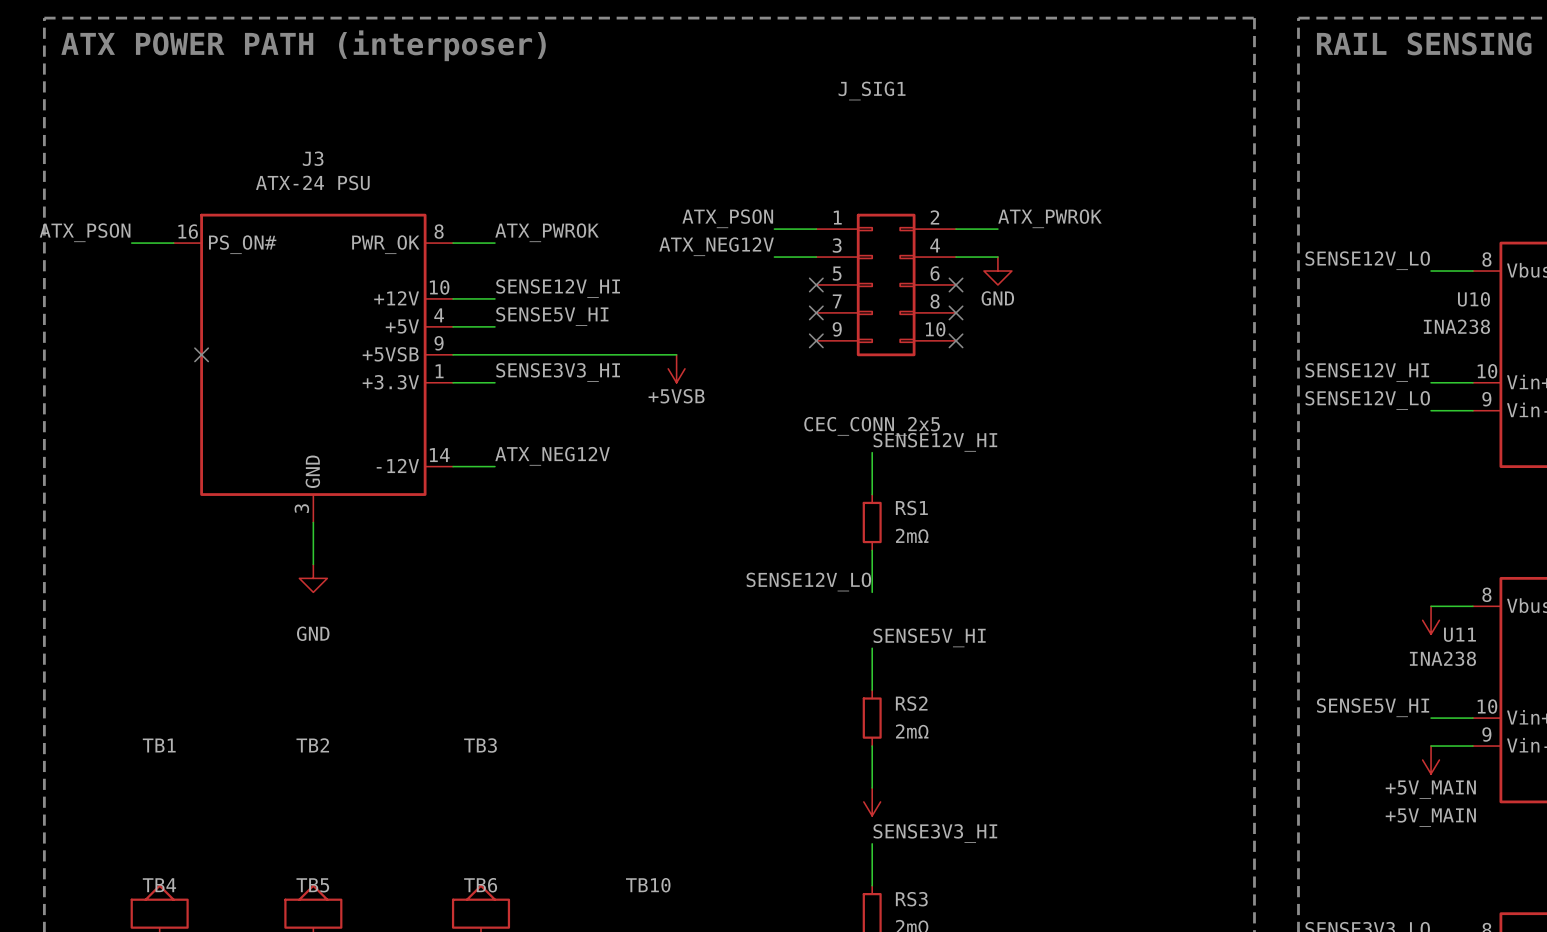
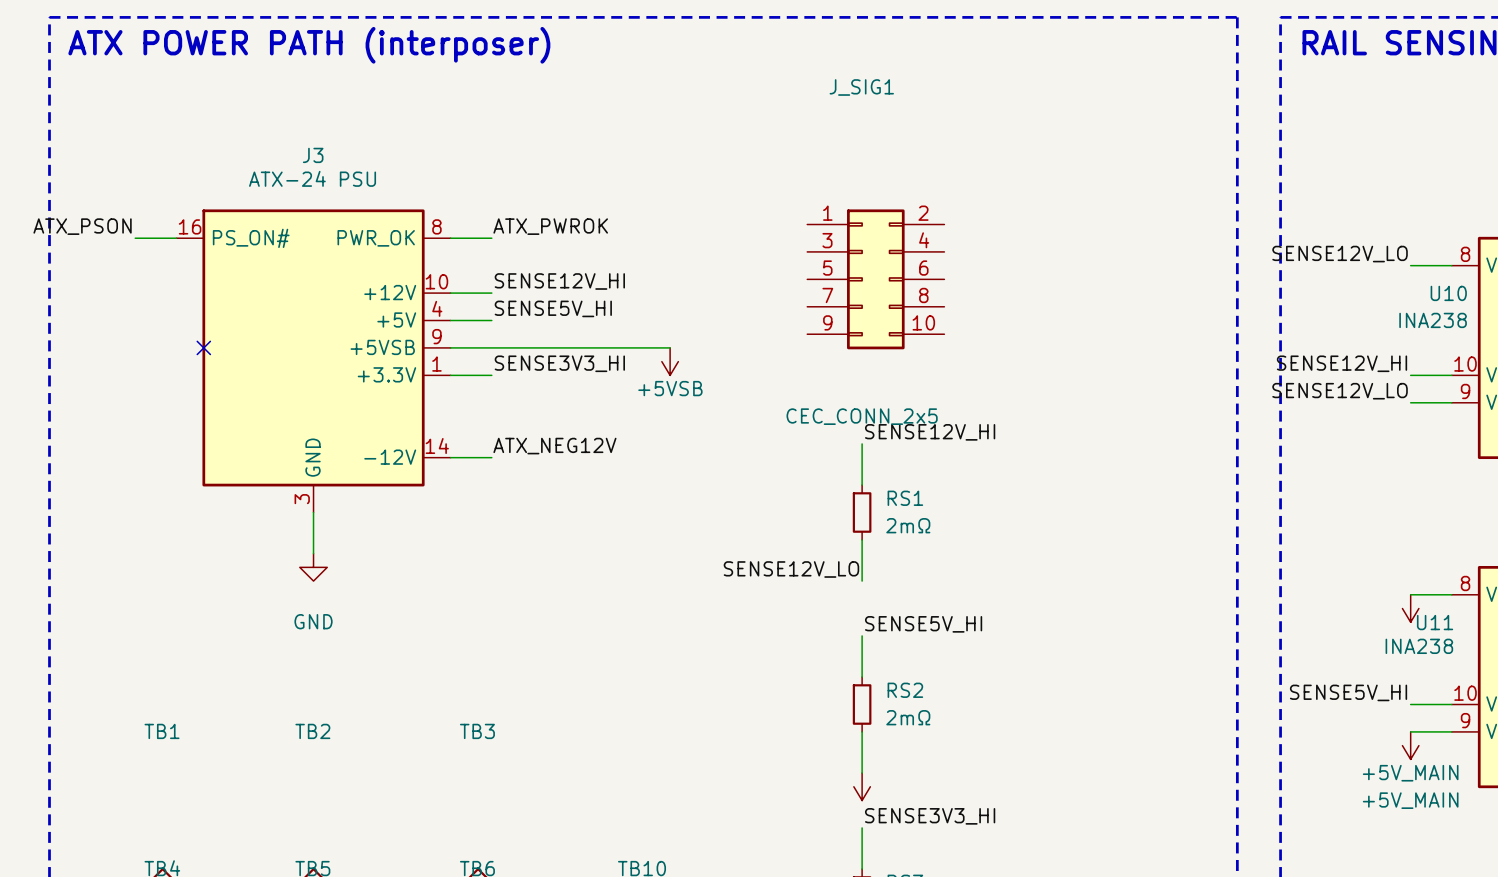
label: ATX_PSON (727, 218) -> none
label: ATX_PWROK (1049, 218) -> none
wire: (774, 229) (816, 229) -> none
wire: (956, 229) (997, 229) -> none
label: ATX_NEG12V (716, 246) -> none
wire: (774, 257) (816, 257) -> none
wire: (956, 257) (997, 257) -> none
power symbol: GND (997, 271) -> none
no-connect mark: (816, 284) -> none
no-connect mark: (956, 284) -> none
no-connect mark: (816, 312) -> none
no-connect mark: (956, 312) -> none
no-connect mark: (816, 340) -> none
no-connect mark: (956, 340) -> none

